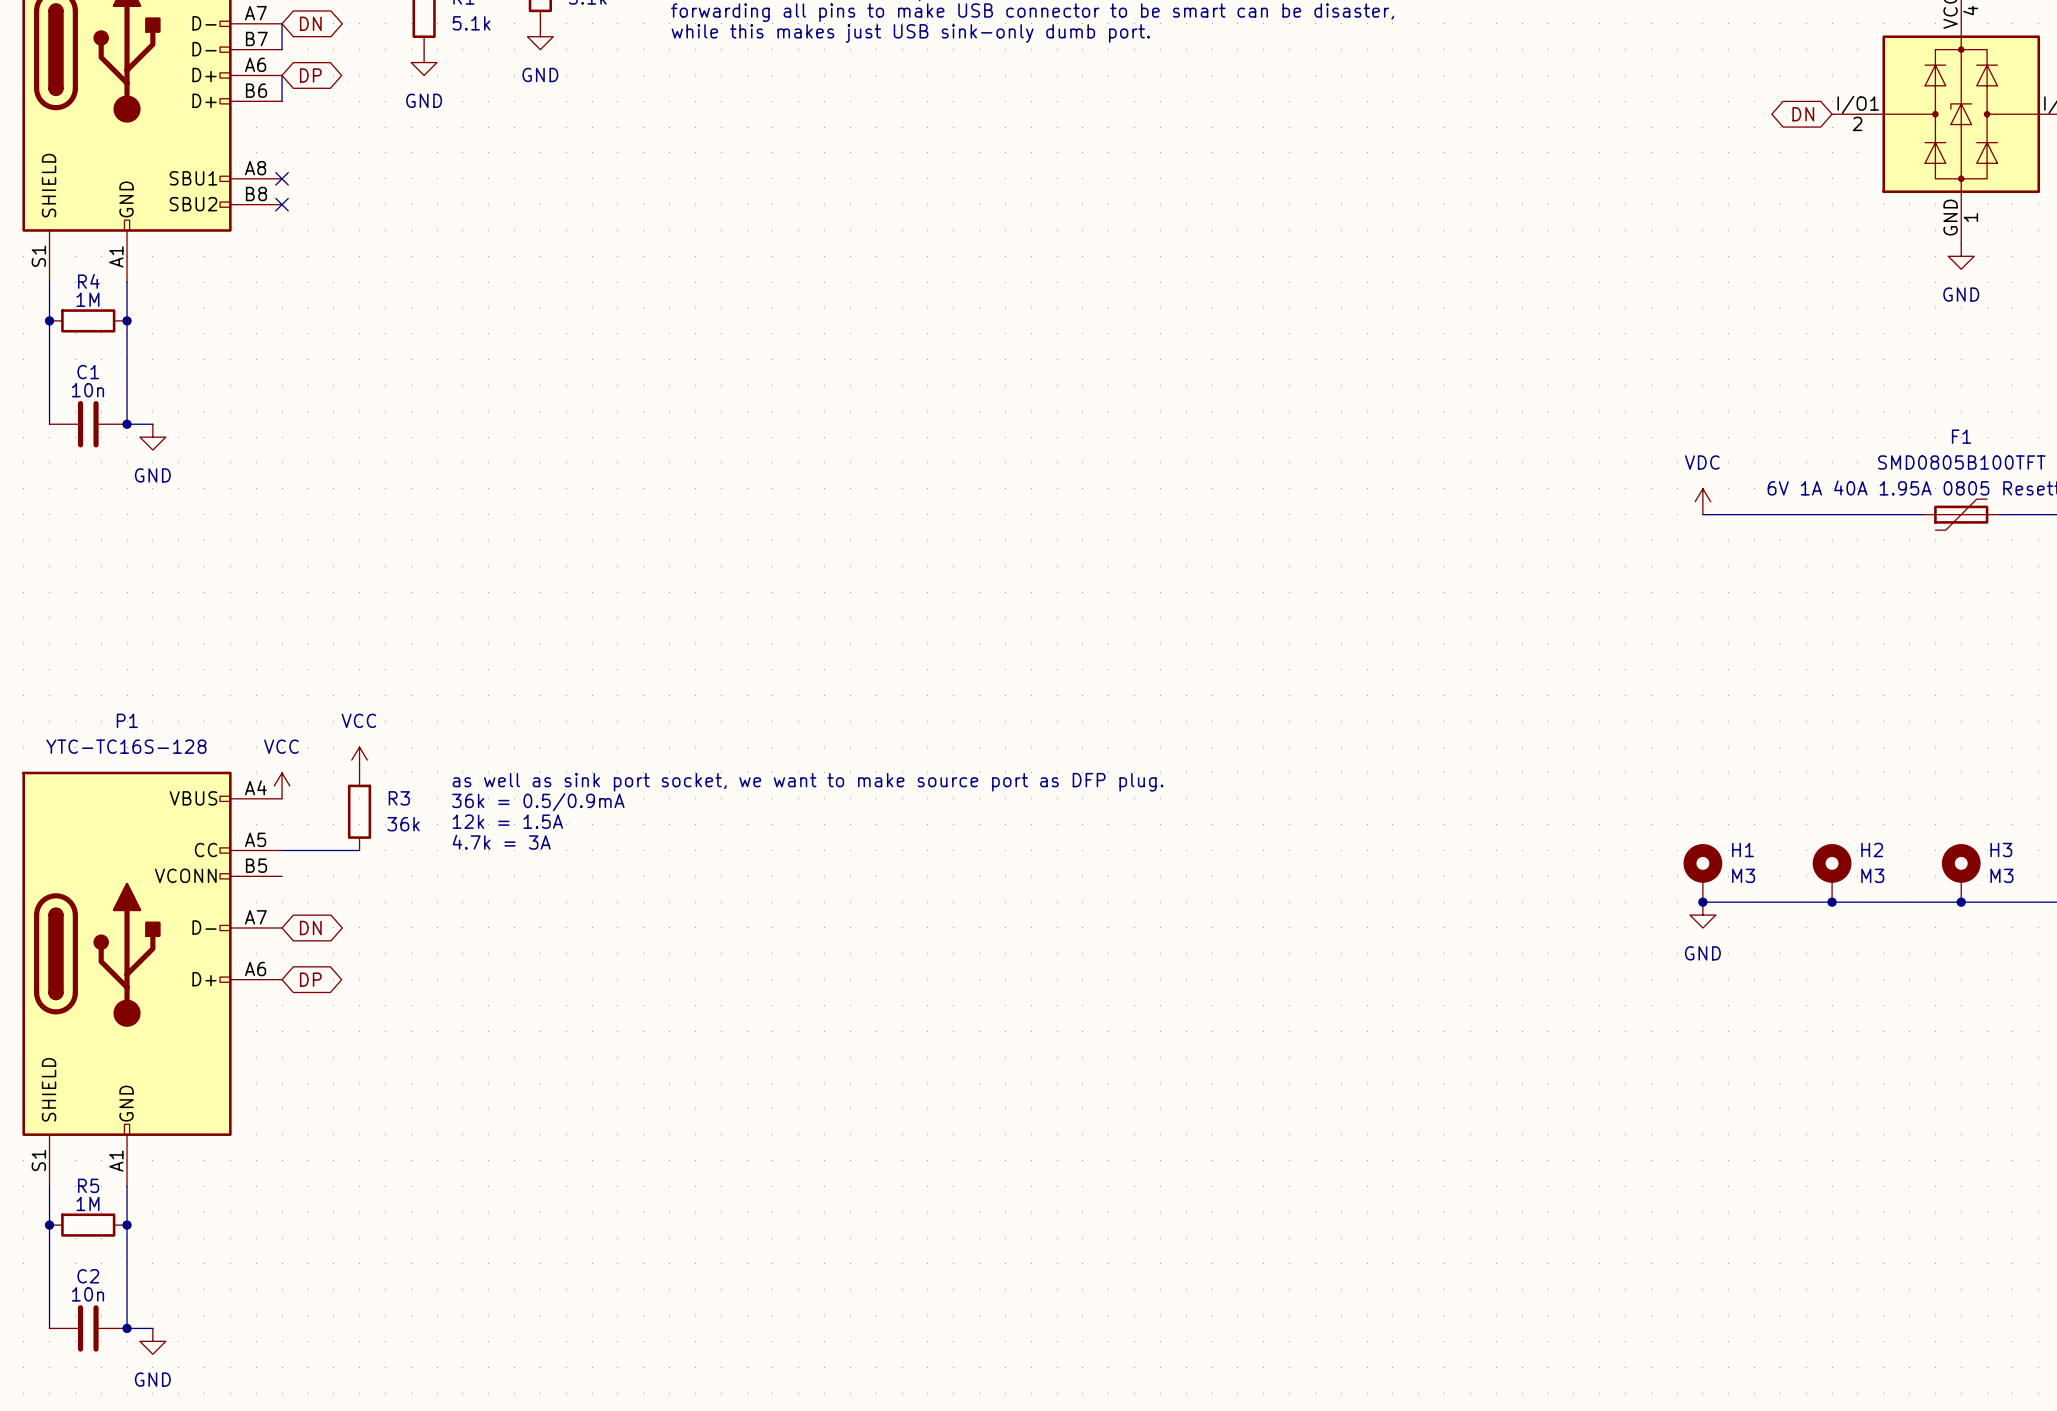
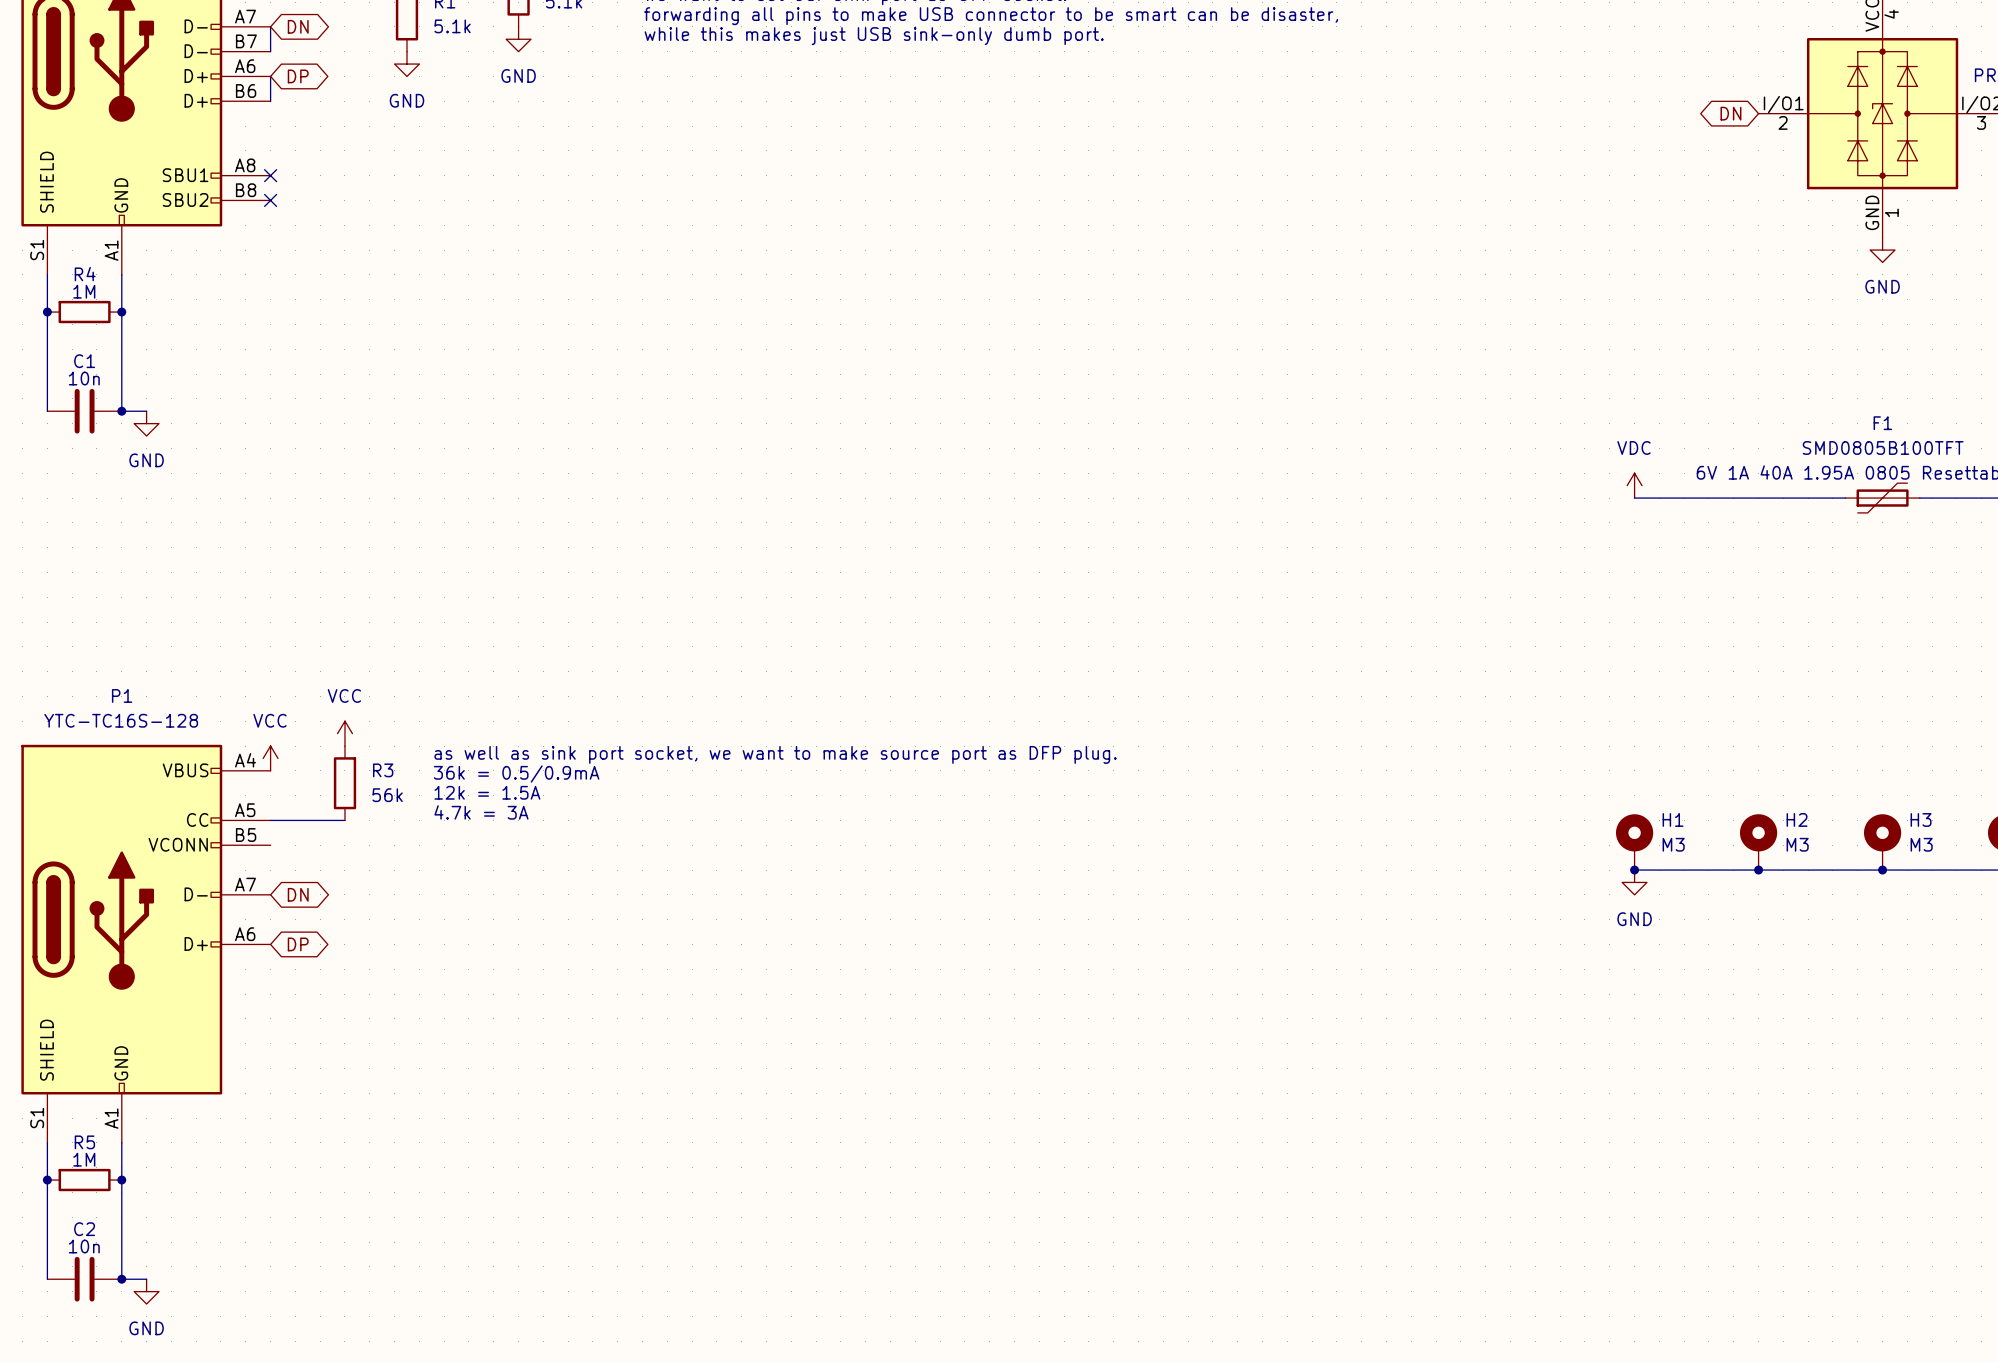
R3 value: 36k (403, 824) -> 56k (387, 795)

